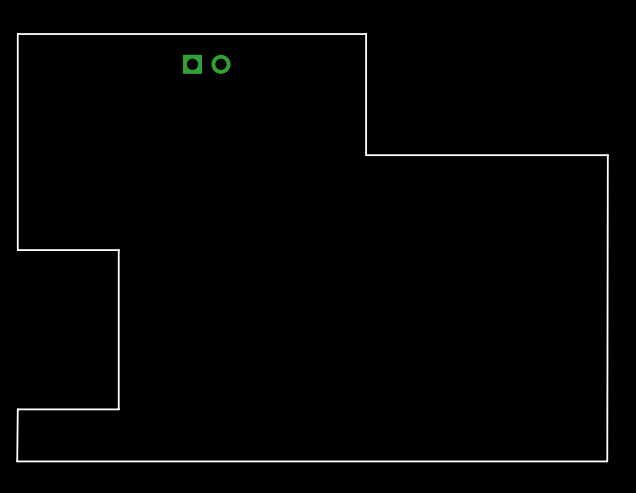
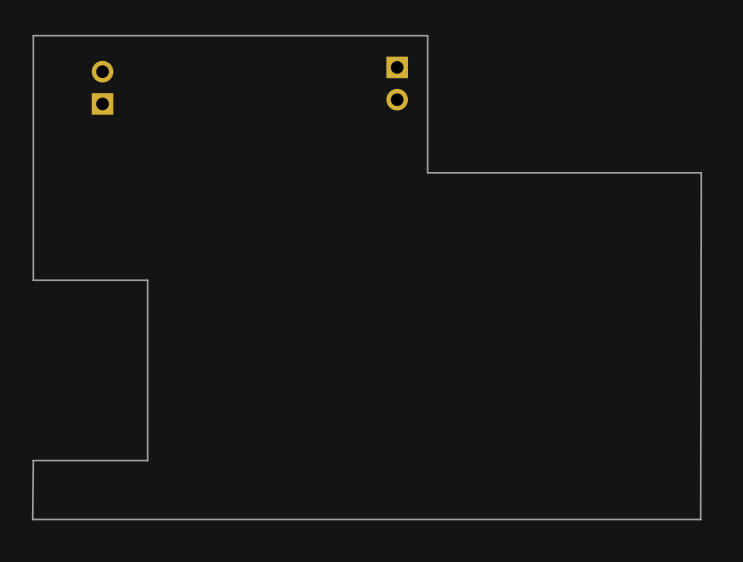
part: (206, 64) -> none
part: none -> (397, 83)
part: none -> (102, 87)

